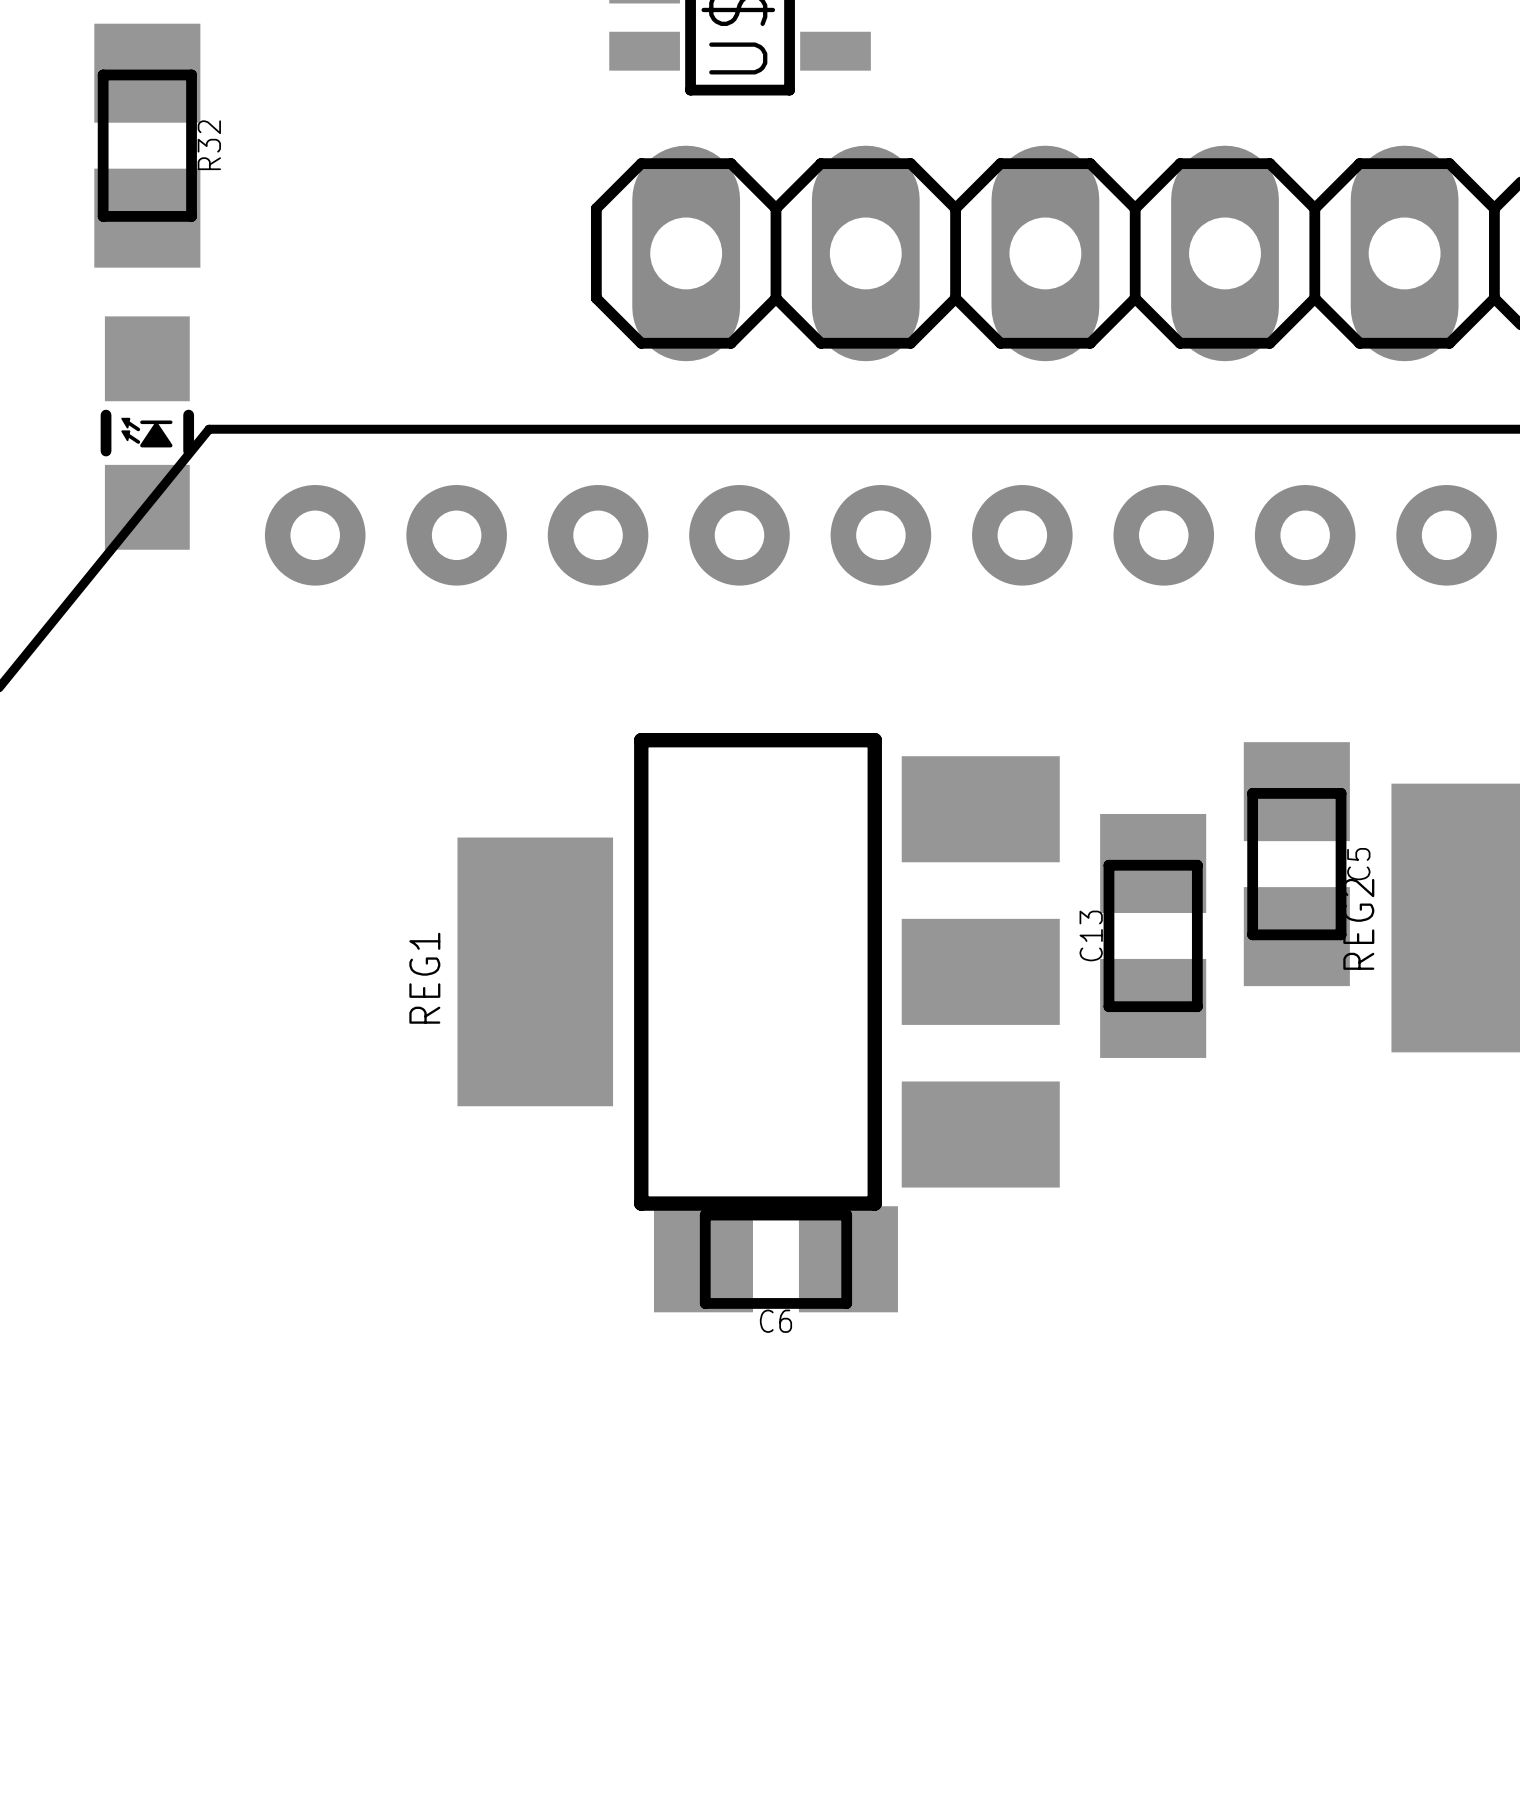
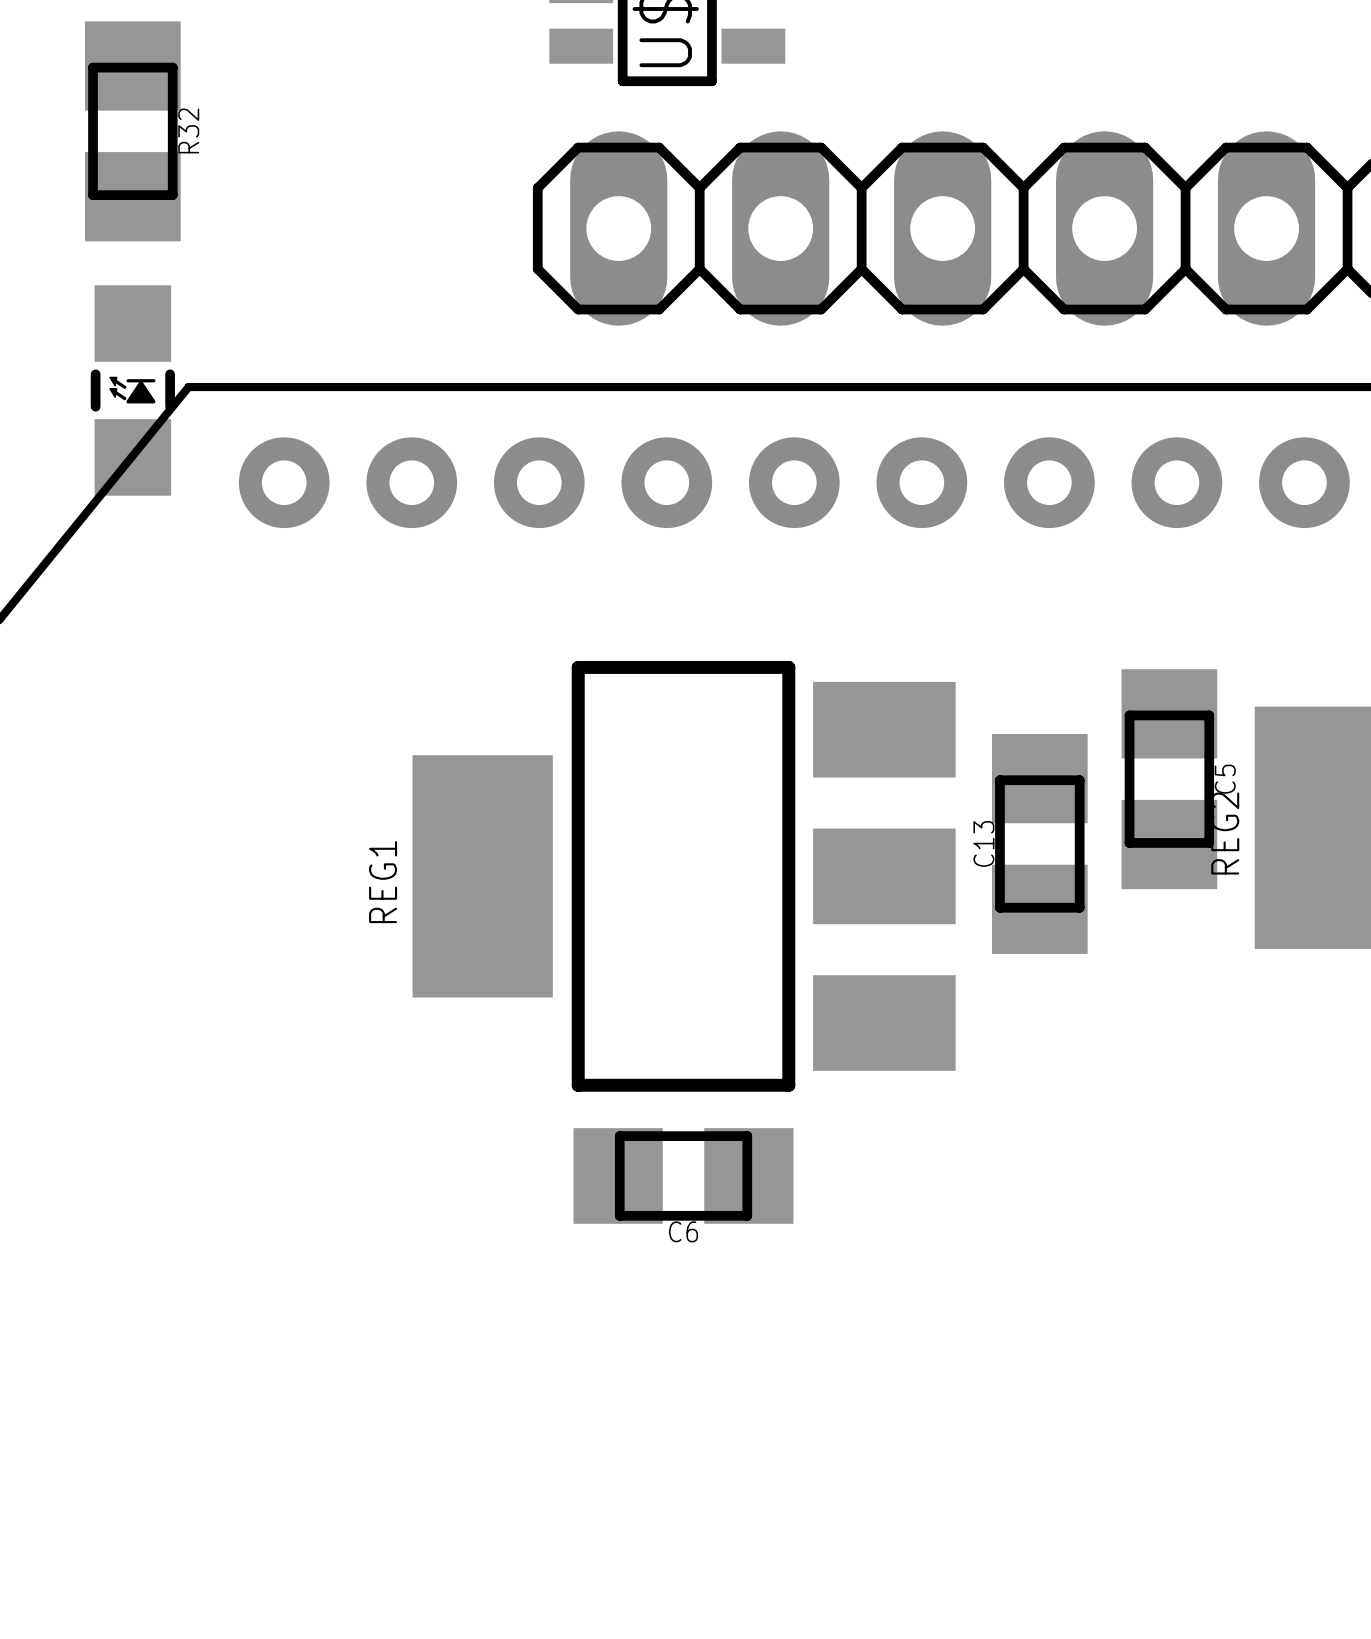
C6 position: (775, 1259) -> (683, 1175)

